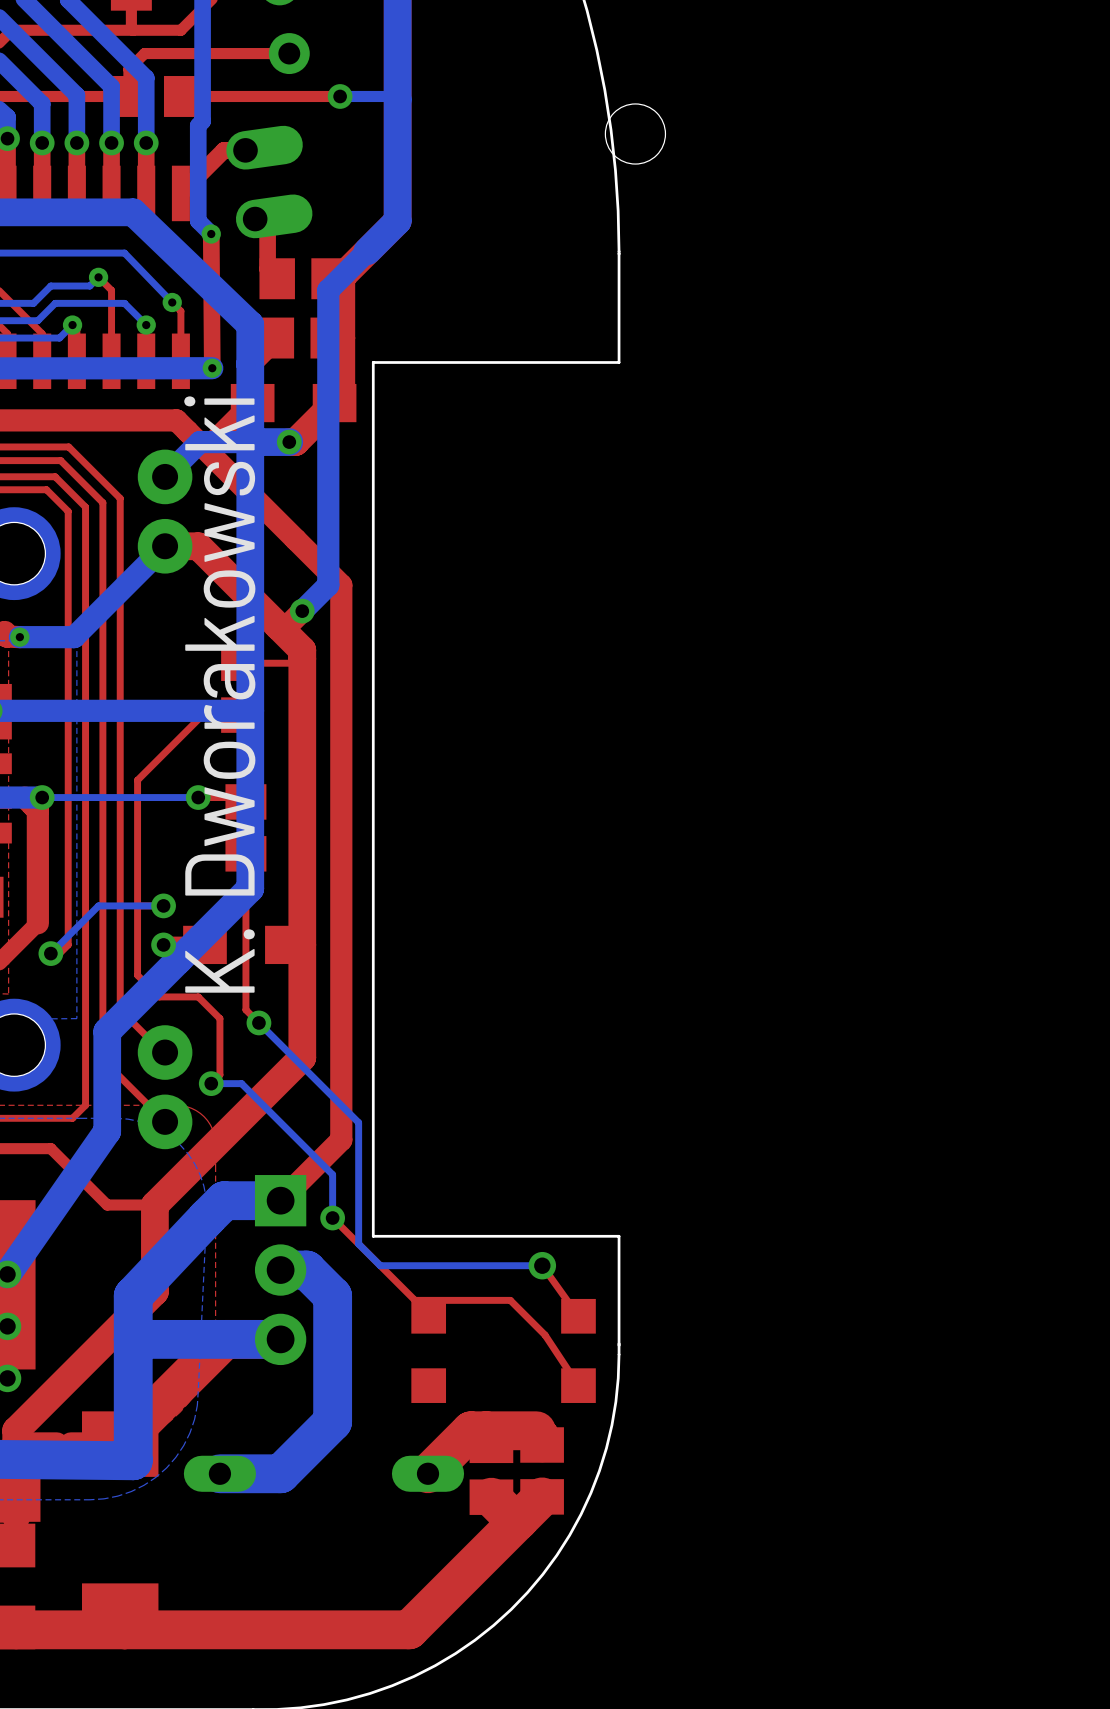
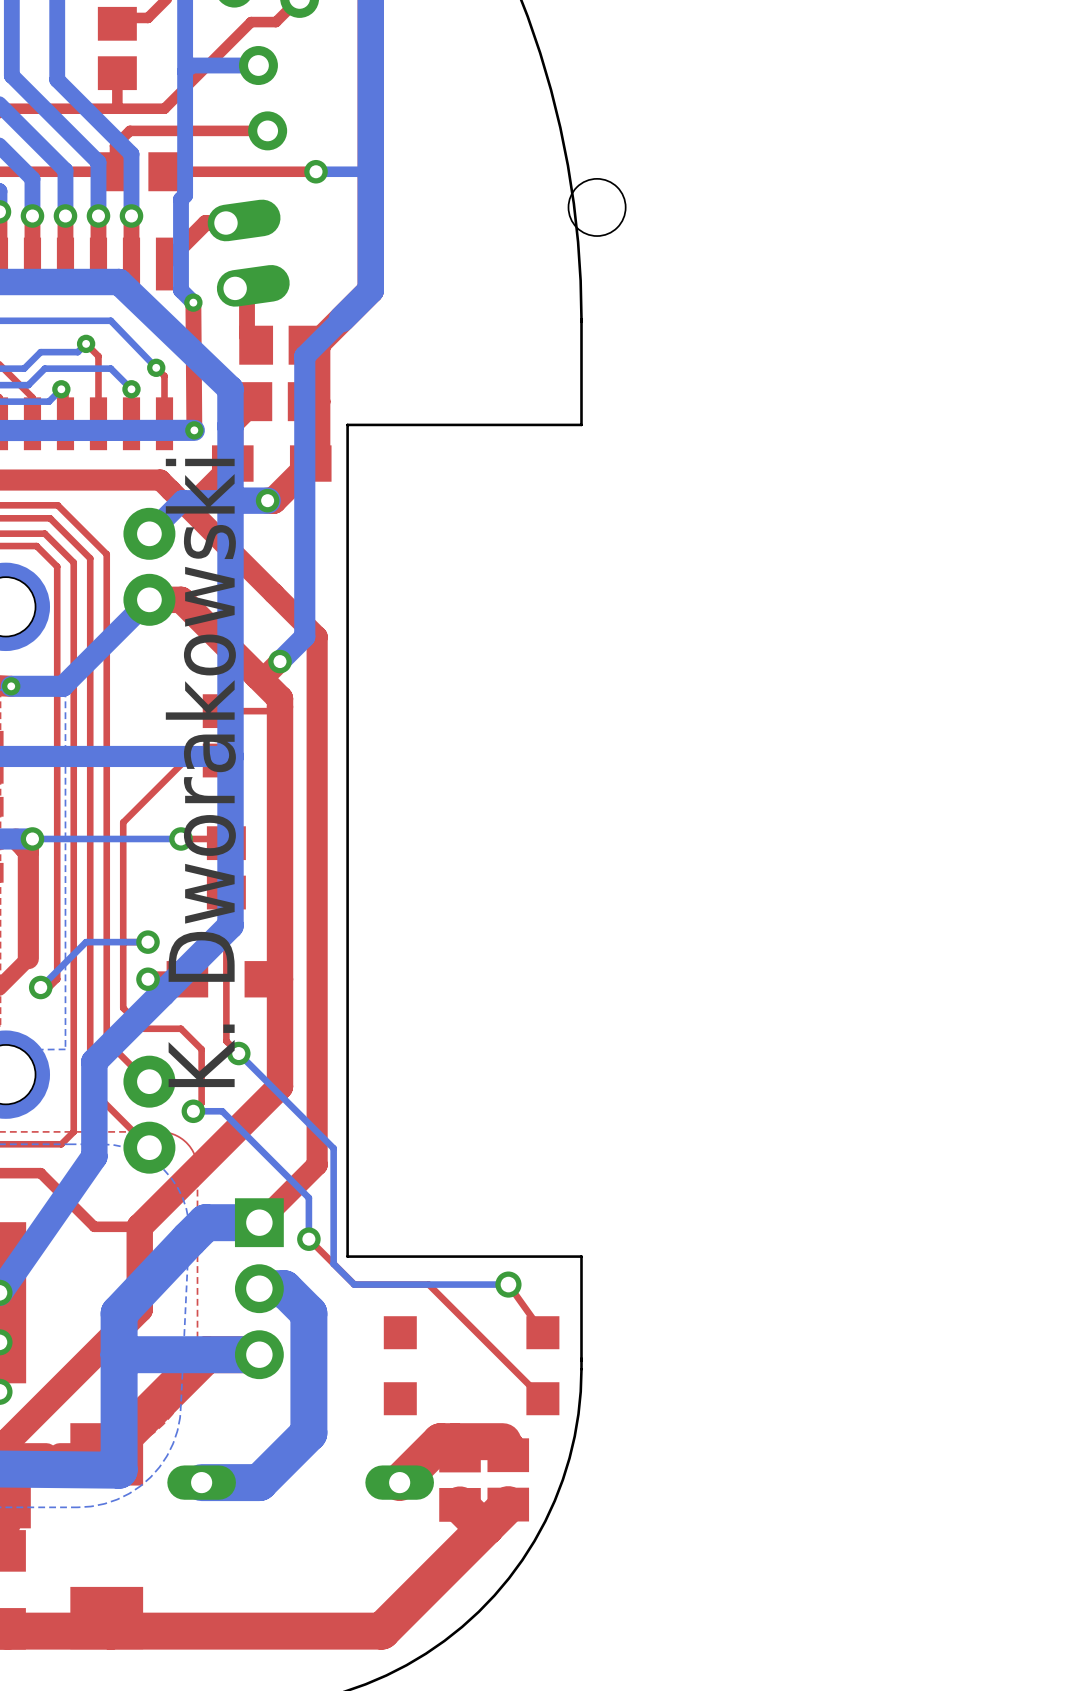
top track: (380, 1265) (415, 1300) (510, 1300) (545, 1335) (578, 1385) -> (354, 1284) (428, 1284) (542, 1398)

